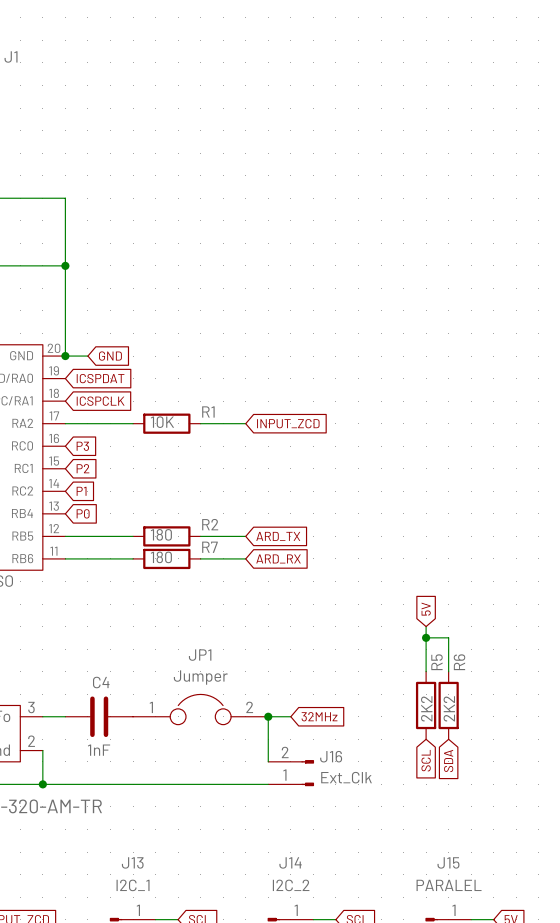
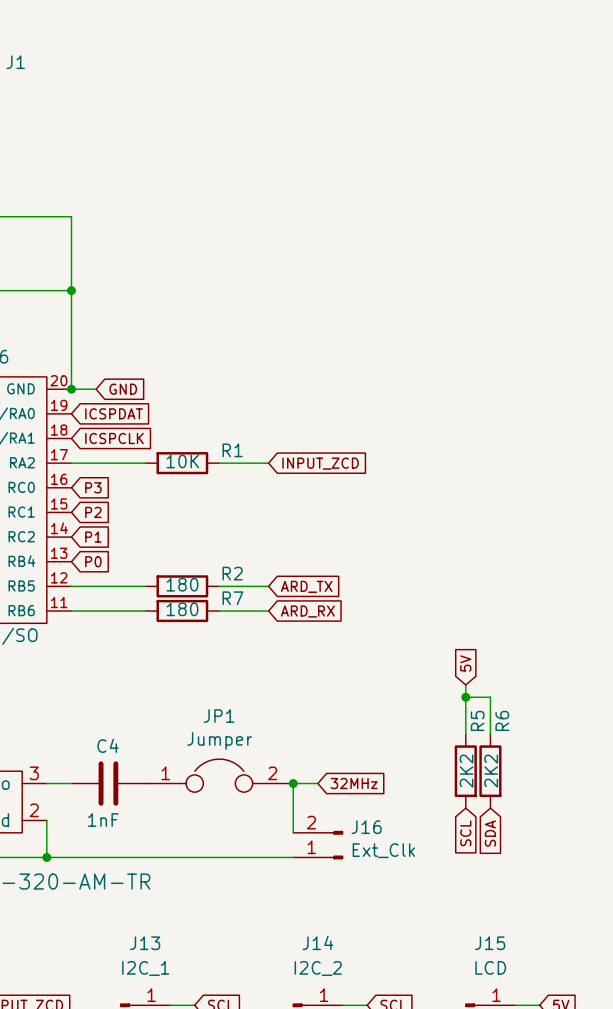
J15 value: PARALEL (449, 885) -> LCD (490, 967)

